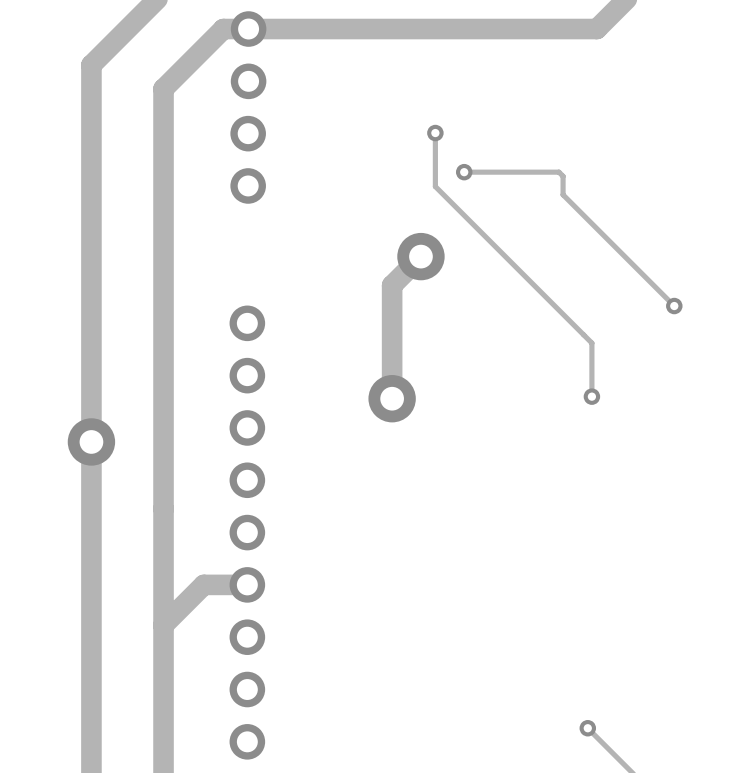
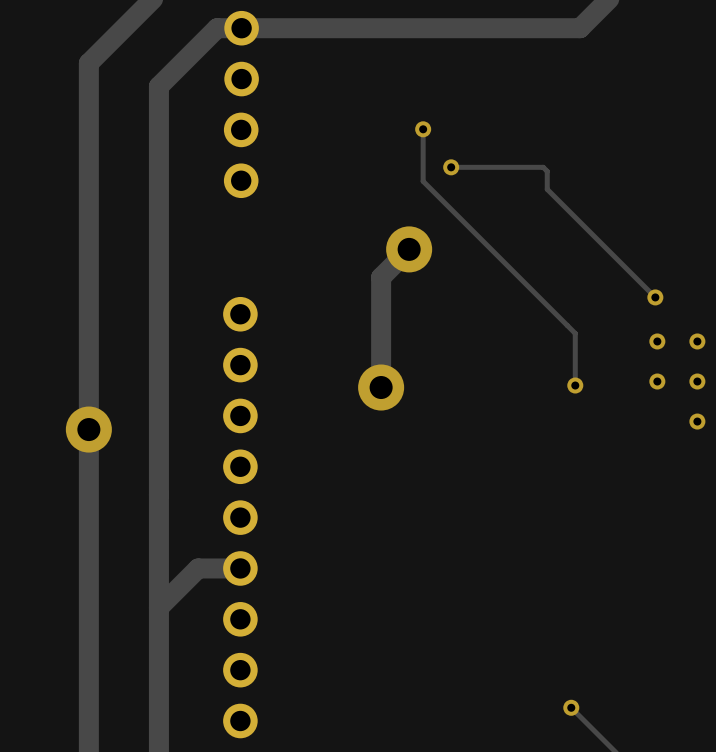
via: none -> (657, 341)
via: none -> (697, 341)
via: none -> (657, 381)
via: none -> (697, 381)
via: none -> (697, 421)

